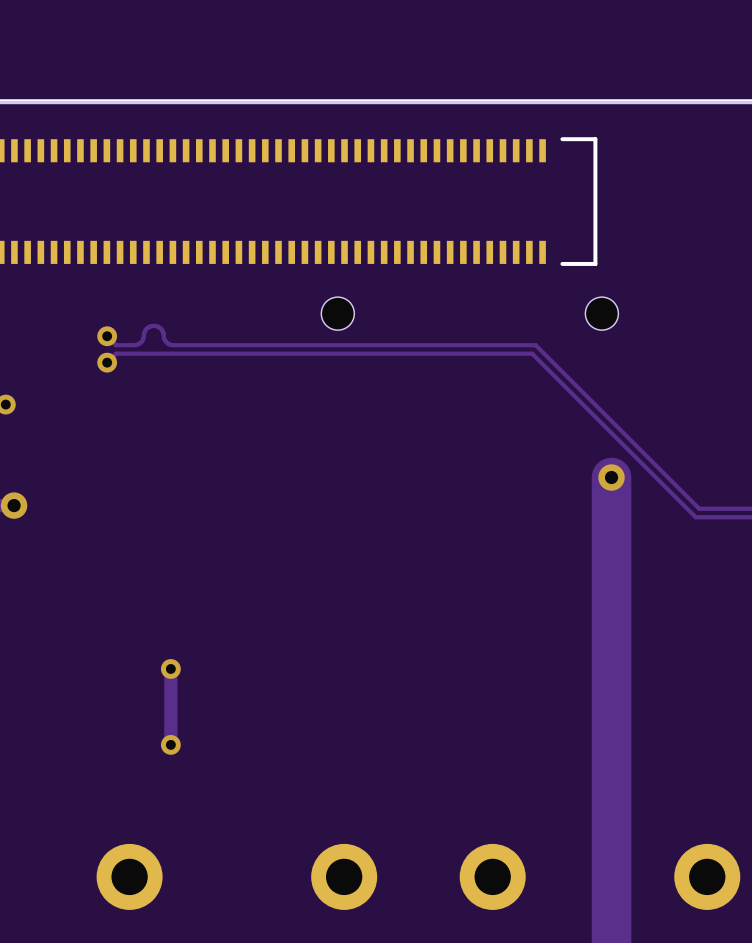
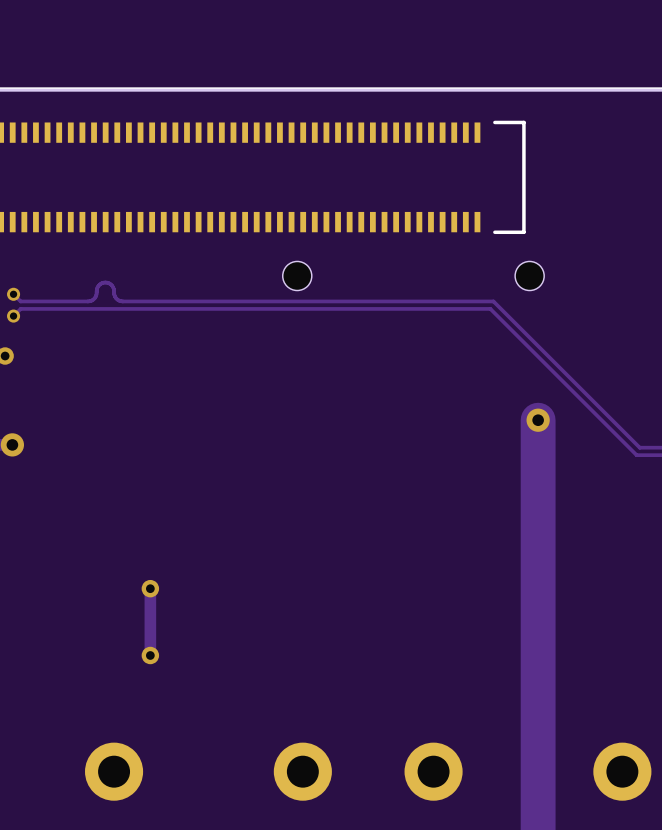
track: (153, 325) (146, 329) (142, 339) (136, 344) (116, 345) (107, 336) -> none
track: (154, 325) (161, 329) (165, 341) (173, 345) (535, 345) (699, 508) (727, 508) -> (13, 294) (20, 301) (89, 301) (95, 296) (98, 285) (105, 282) (112, 285) (116, 298) (122, 301) (493, 301) (639, 447)
via: none -> (13, 294)
via: (107, 336) -> none
via: none -> (13, 316)
track: (107, 362) (116, 353) (532, 353) (695, 517) (723, 517) -> (13, 316) (20, 308) (490, 308) (636, 455)
via: (107, 362) -> none

